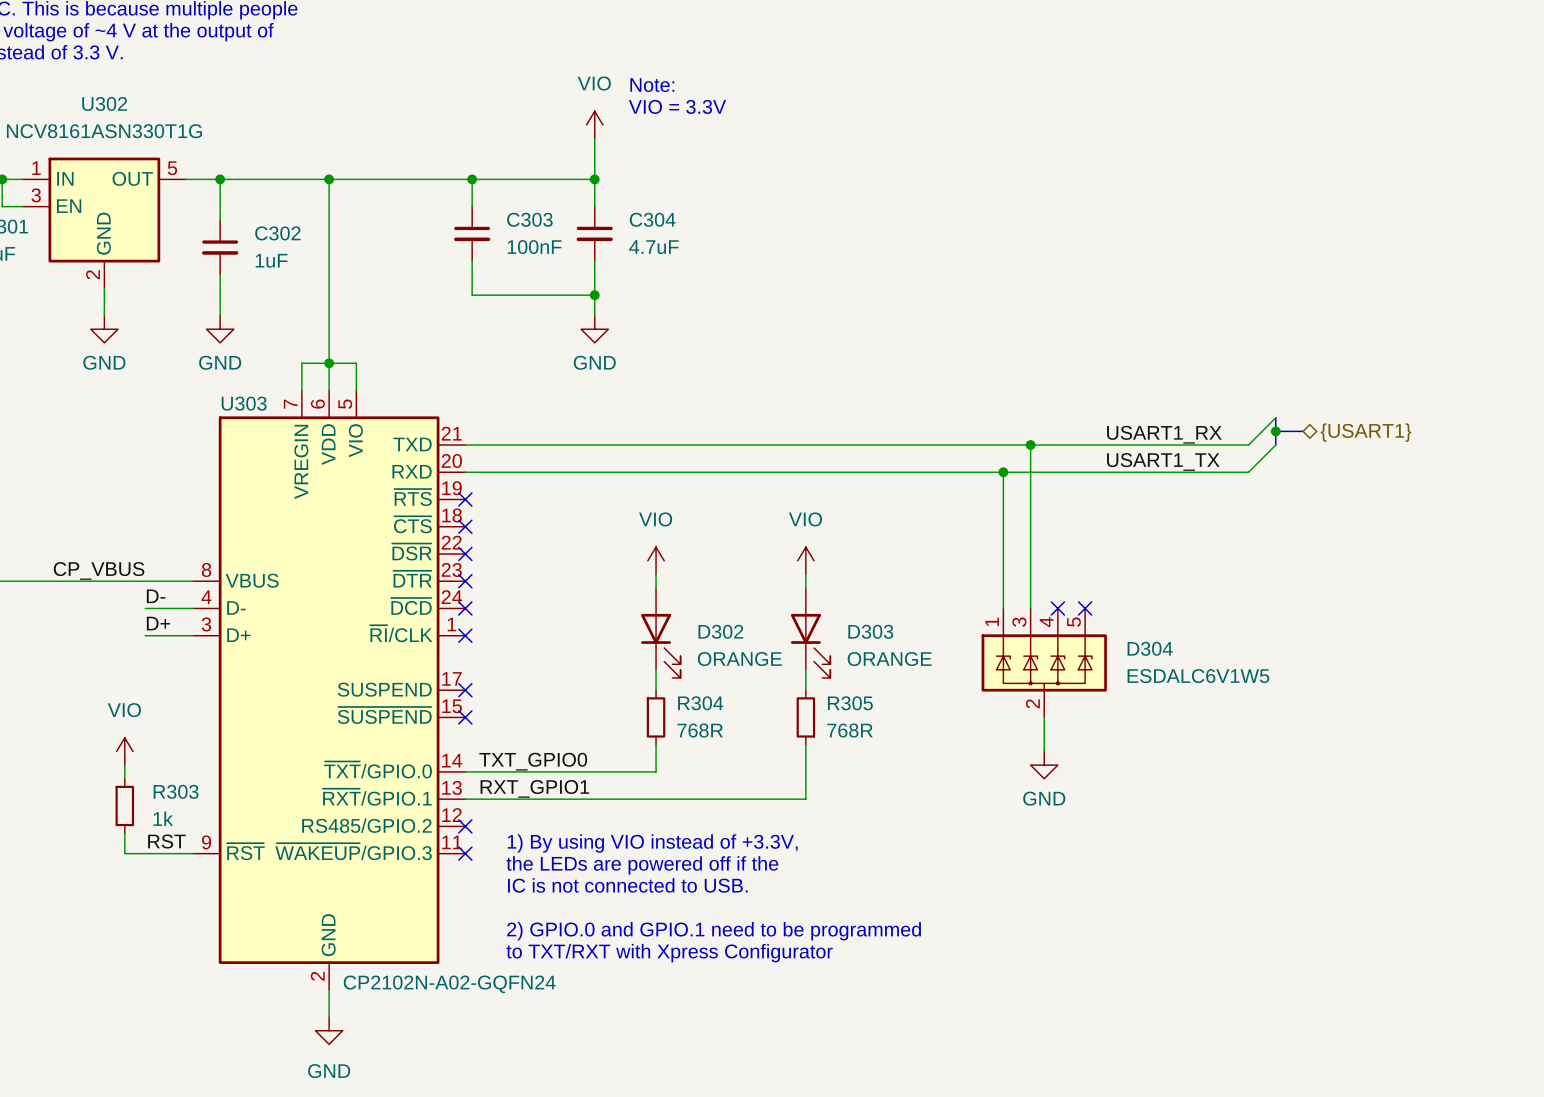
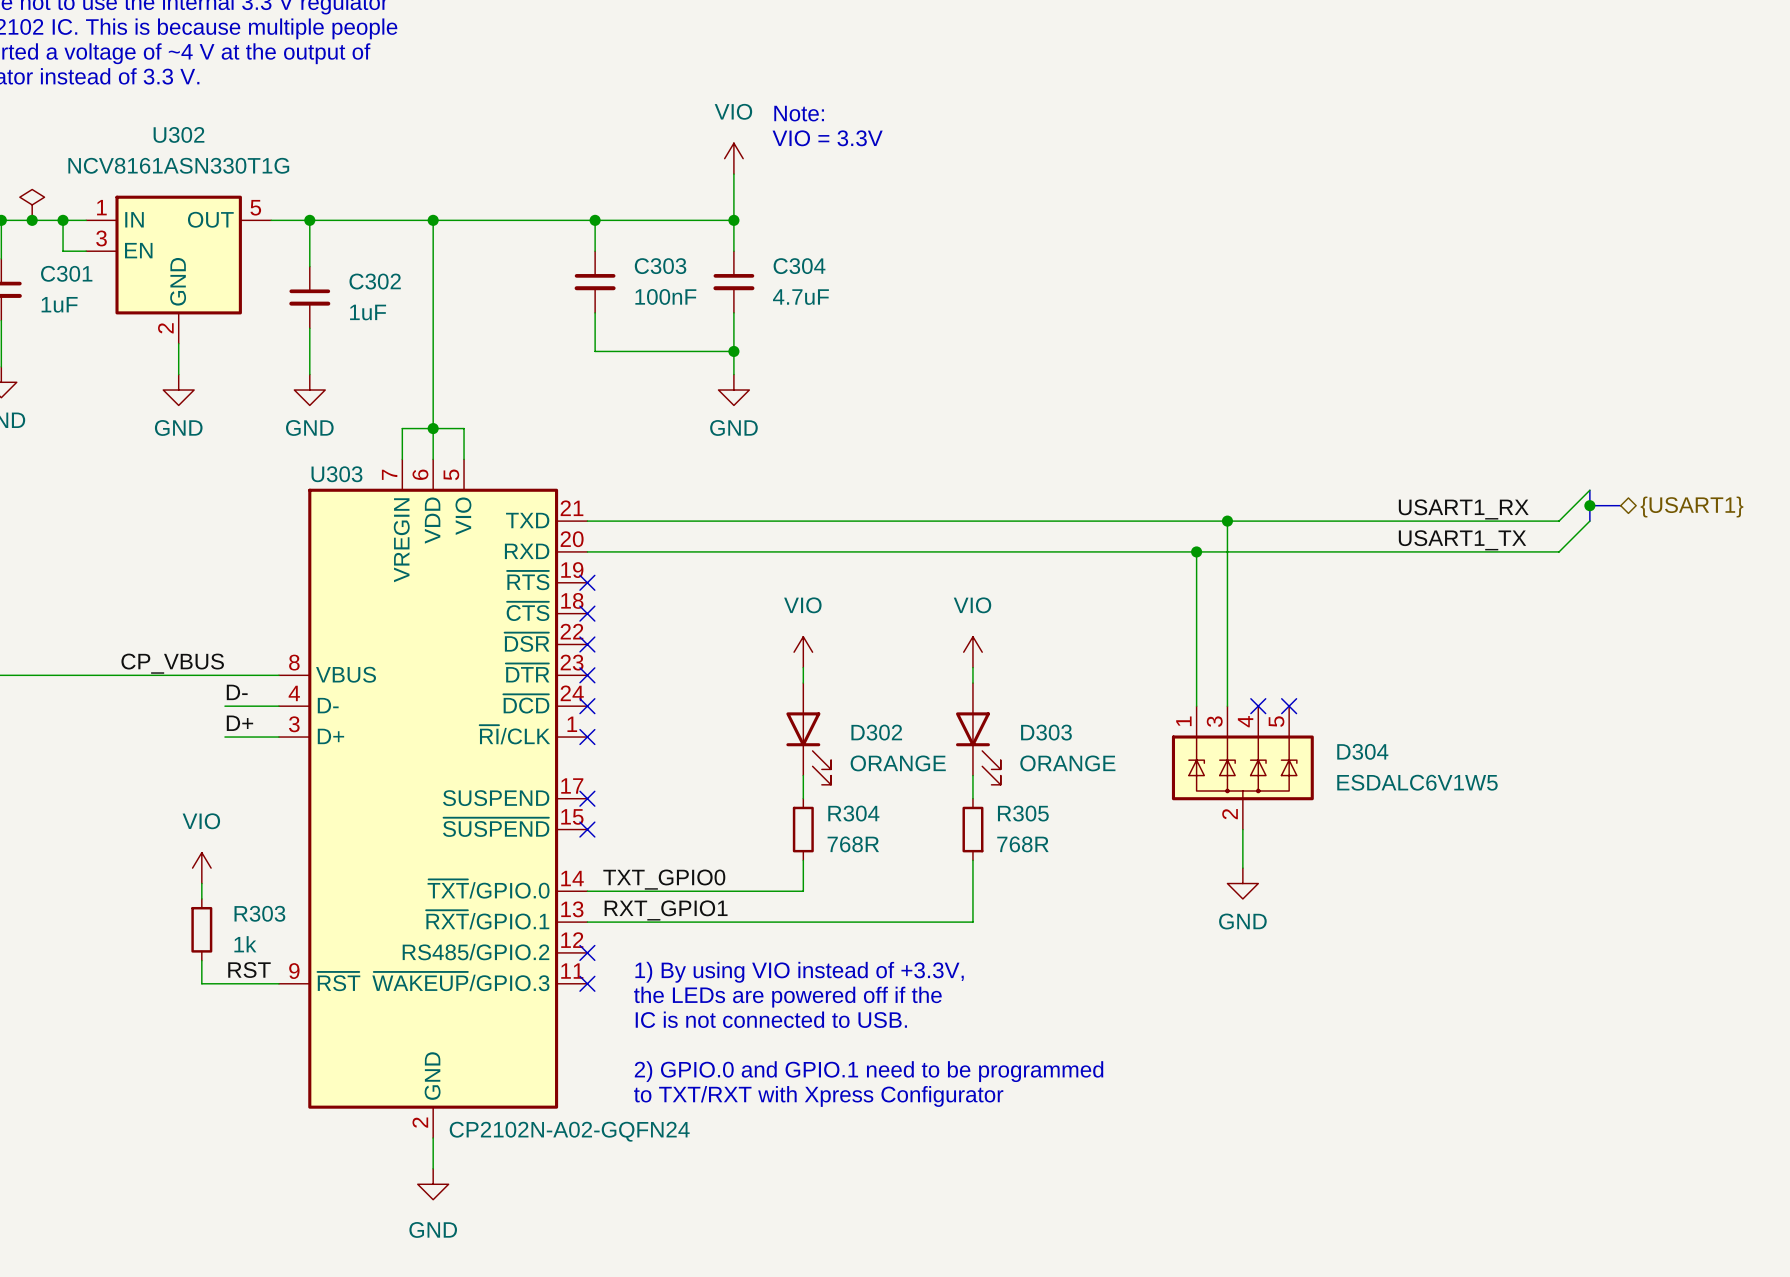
wire: (1275, 417) (1248, 445) -> (1589, 490) (1559, 521) (1474, 521)
bus: (1275, 417) (1275, 445) -> (1589, 490) (1589, 521)
bus: (1275, 431) (1303, 431) -> (1589, 505) (1620, 505)
junction: (1275, 431) -> none
junction: none -> (1589, 505)
hierarchical label position: {USART1} (1366, 432) -> {USART1} (1692, 507)
label position: USART1_RX (1164, 434) -> USART1_RX (1463, 509)
wire: (1275, 445) (1248, 472) -> (1589, 521) (1559, 551) (1474, 551)
label position: USART1_TX (1163, 461) -> USART1_TX (1462, 540)

